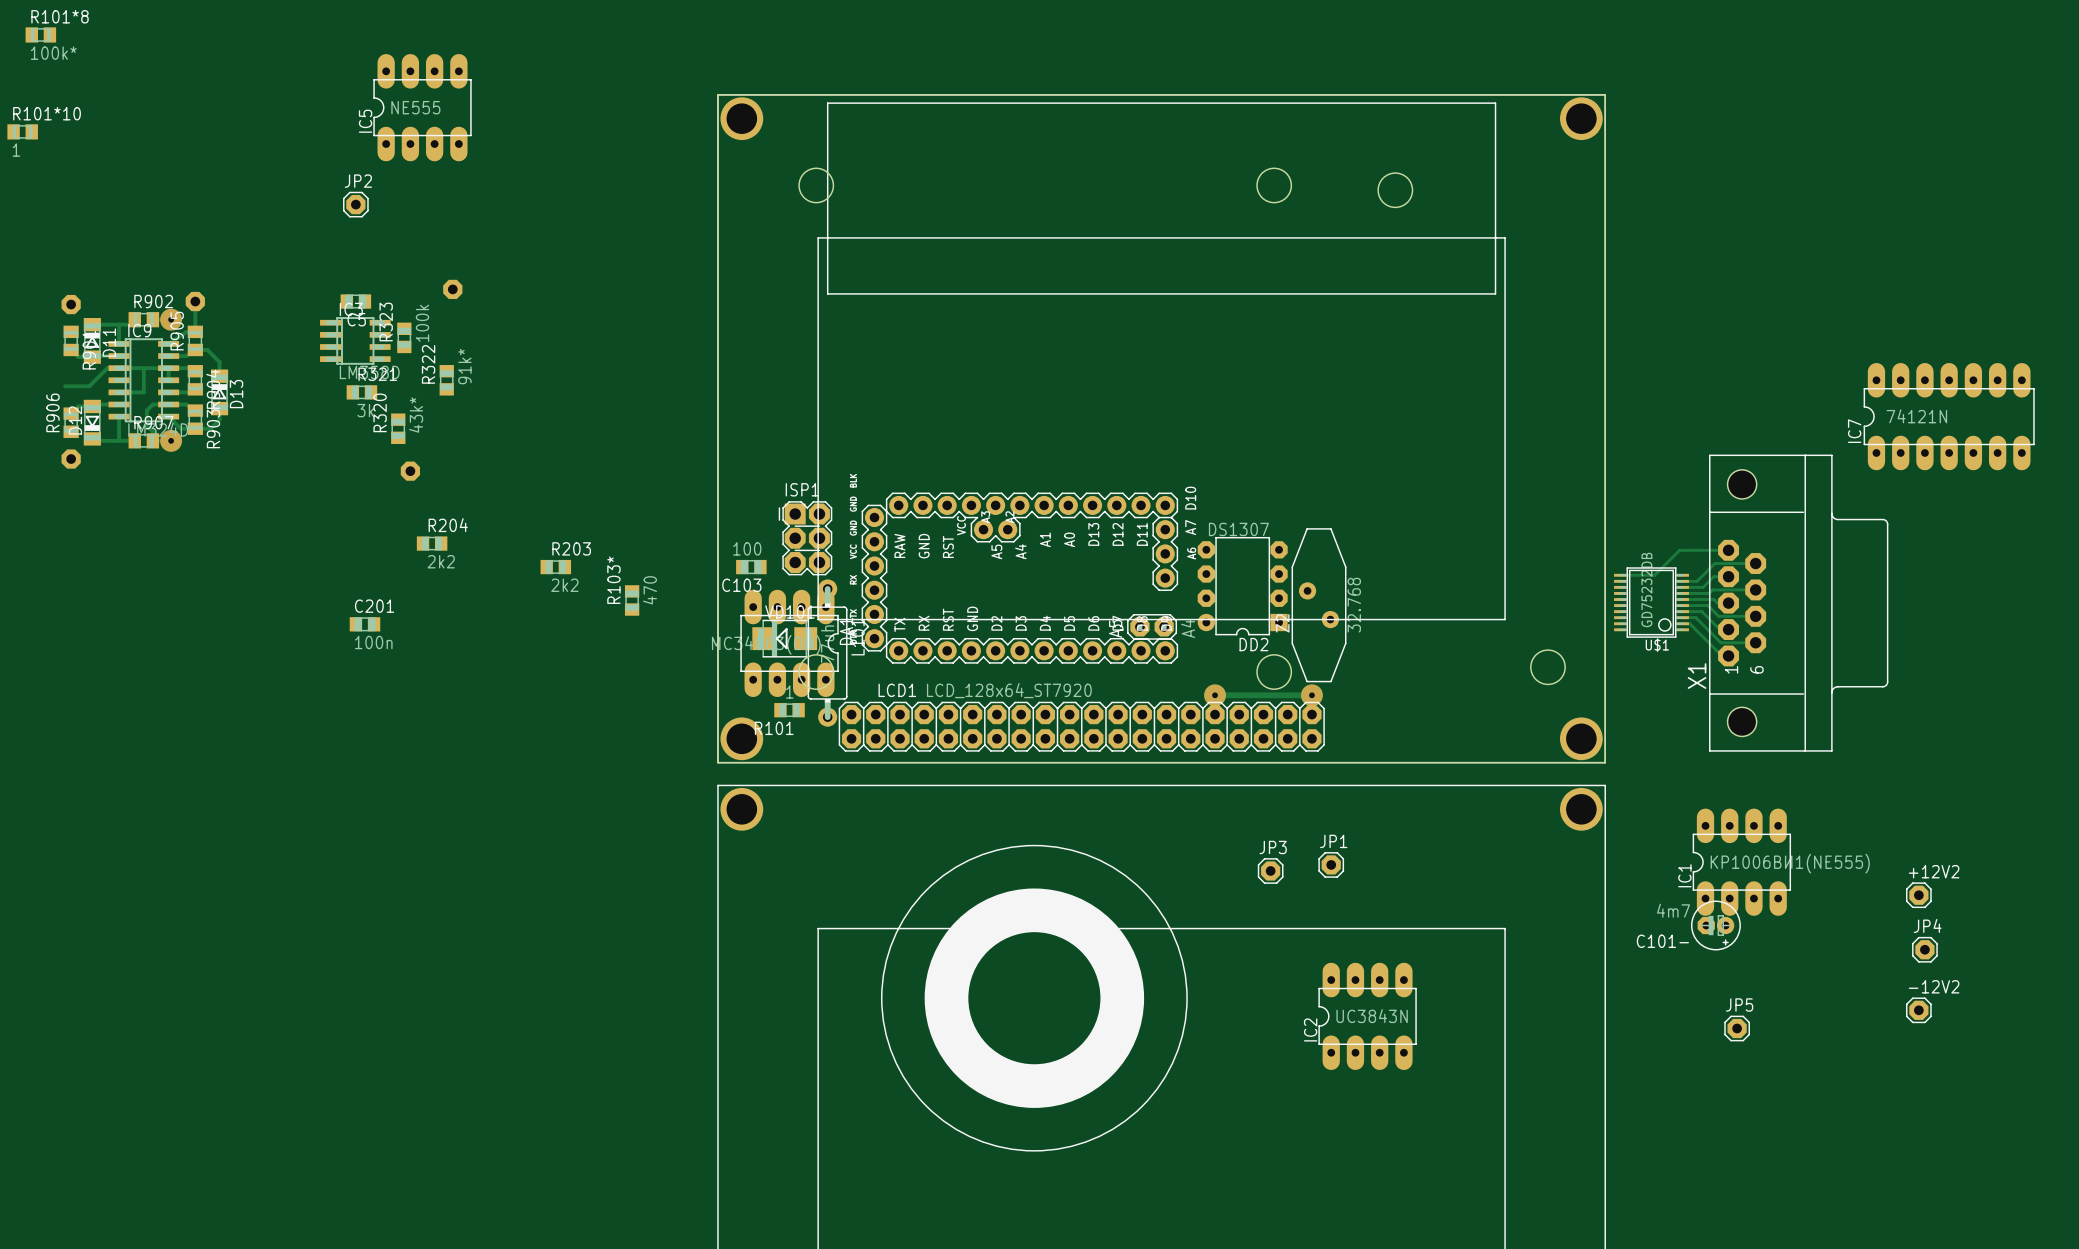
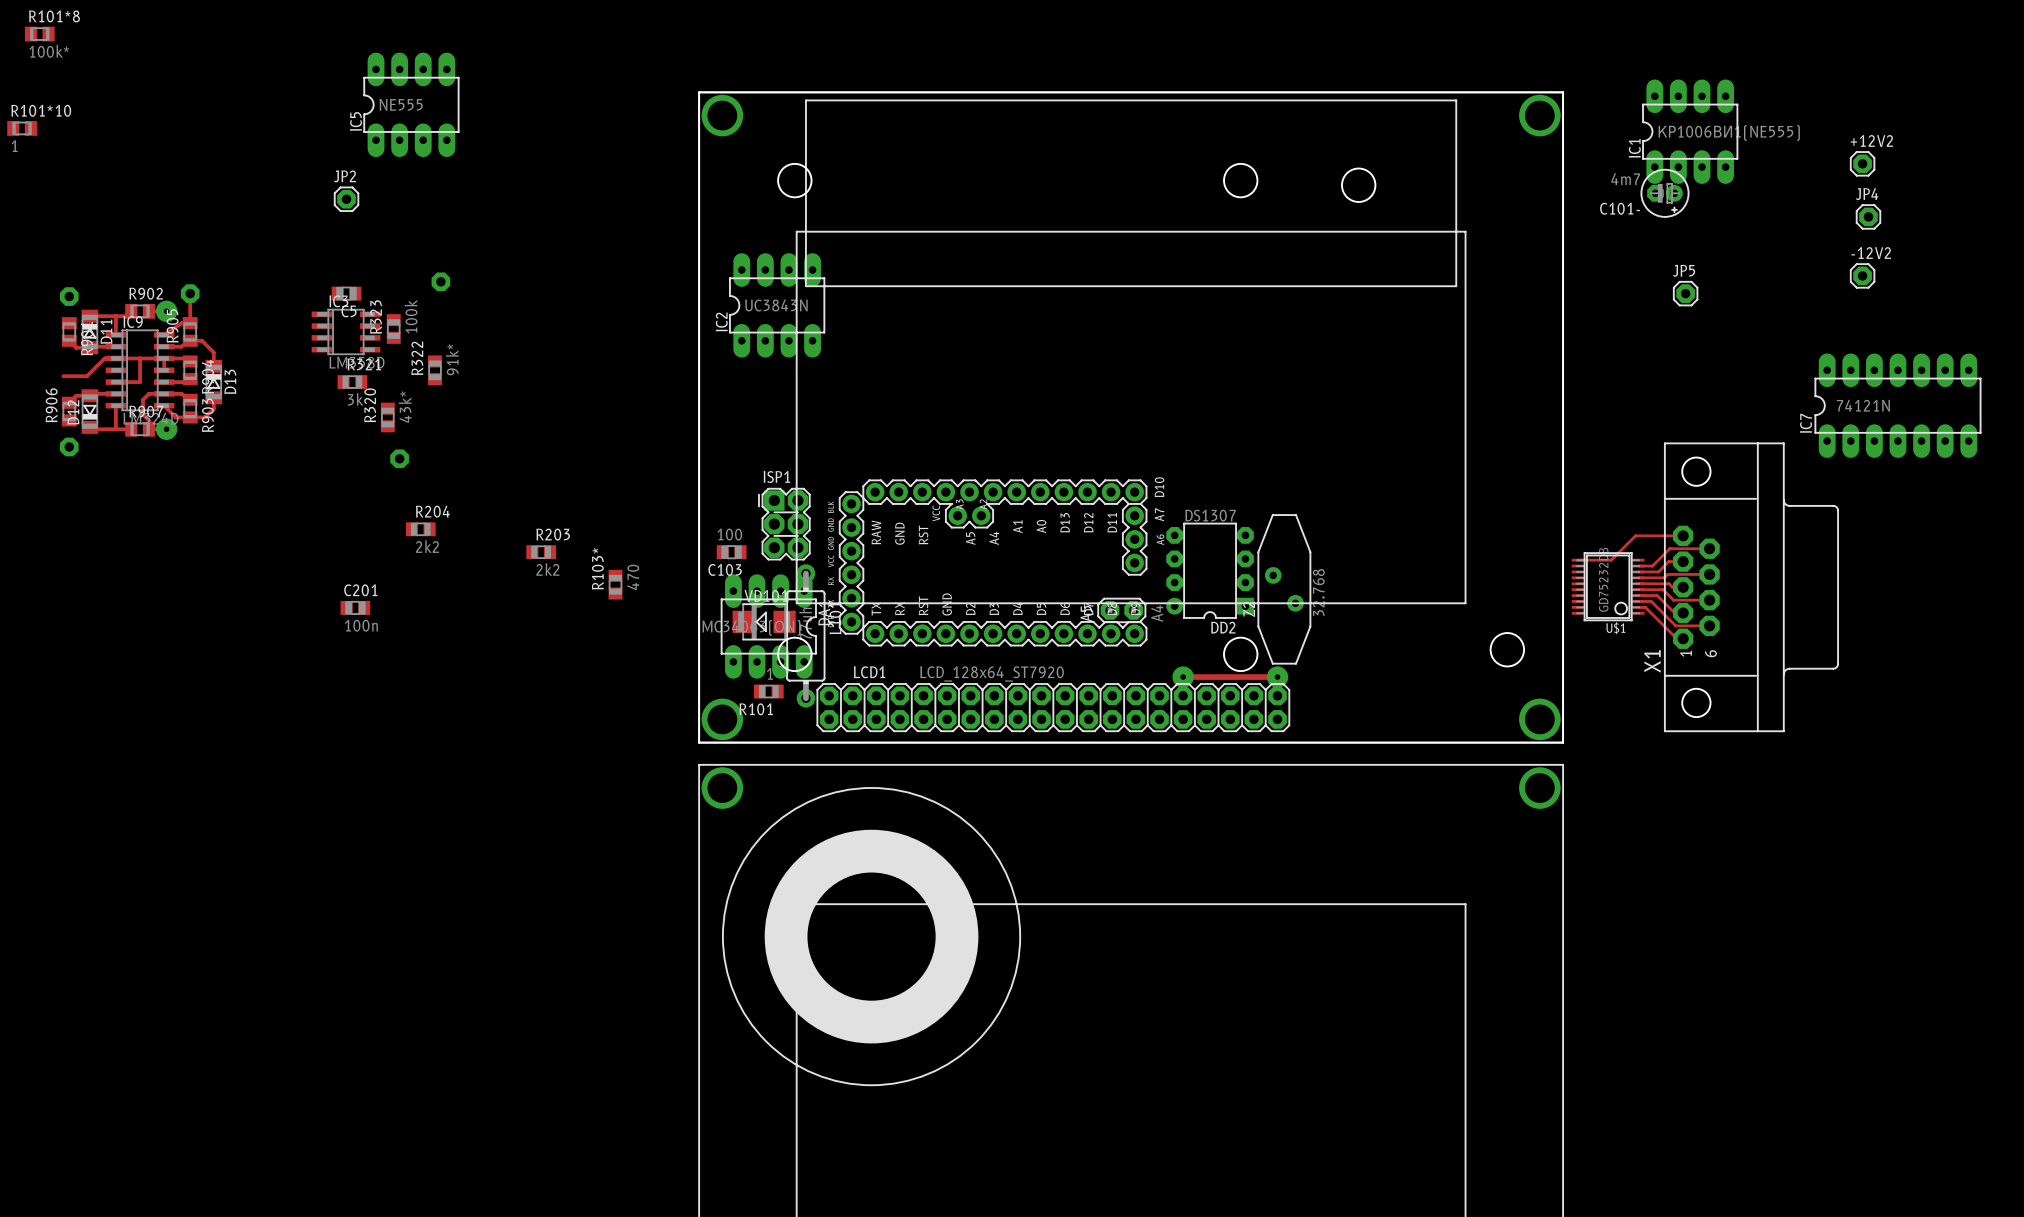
IC1 position: (1741, 862) -> (1690, 131)
JP1: (1331, 864) -> none
JP3: (1270, 870) -> none
+12V2 position: (1918, 895) -> (1862, 163)
C101- position: (1715, 925) -> (1664, 193)
JP4 position: (1924, 949) -> (1868, 216)
drawing position: (1034, 998) -> (871, 936)
-12V2 position: (1918, 1010) -> (1862, 275)
IC2 position: (1367, 1016) -> (777, 305)
JP5 position: (1737, 1028) -> (1685, 293)

